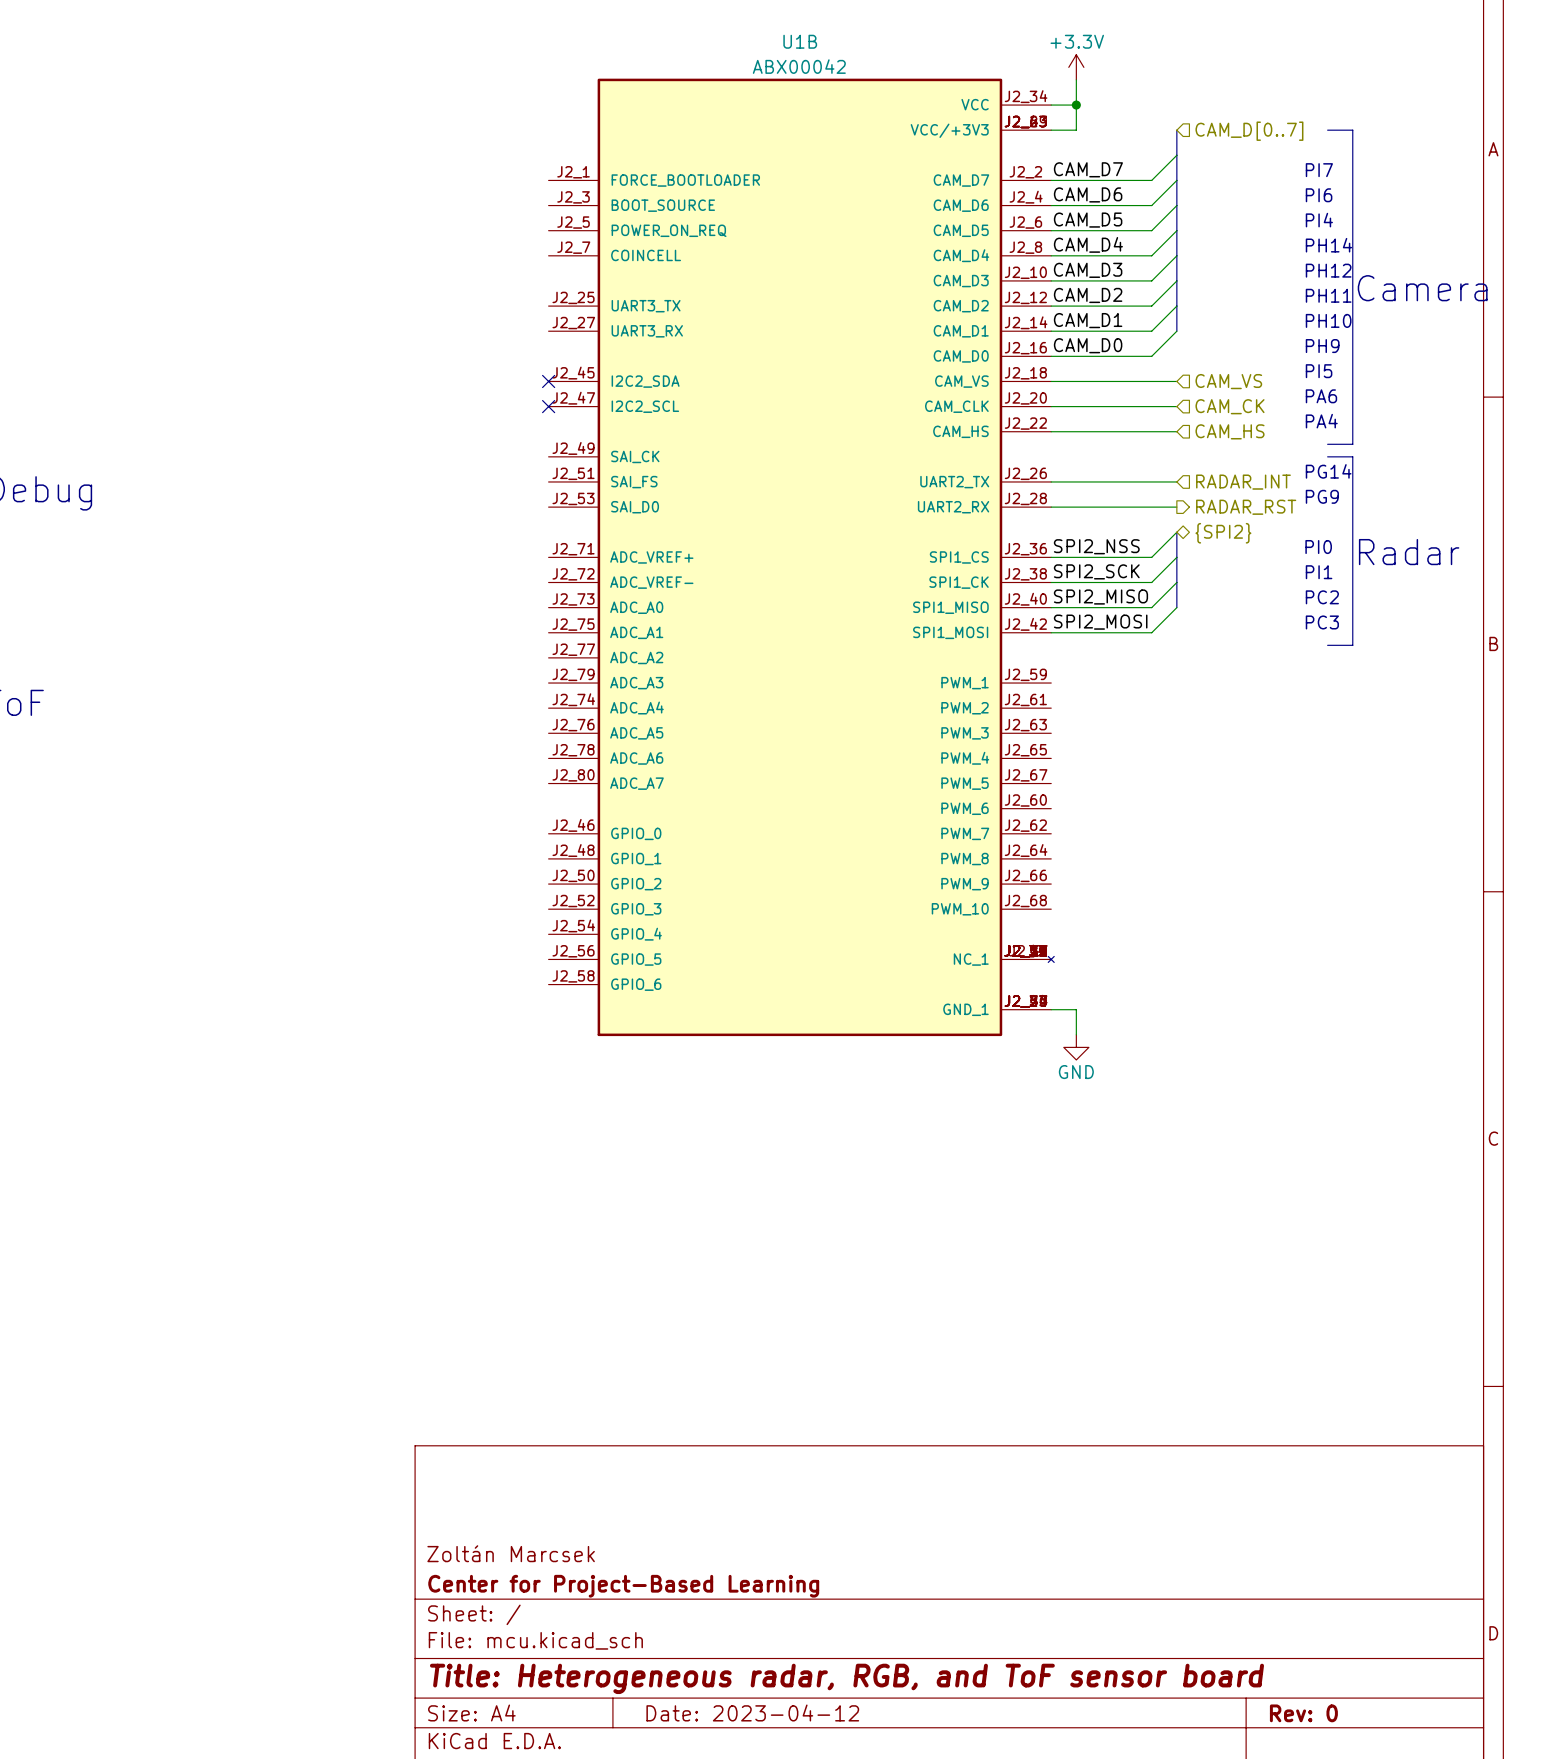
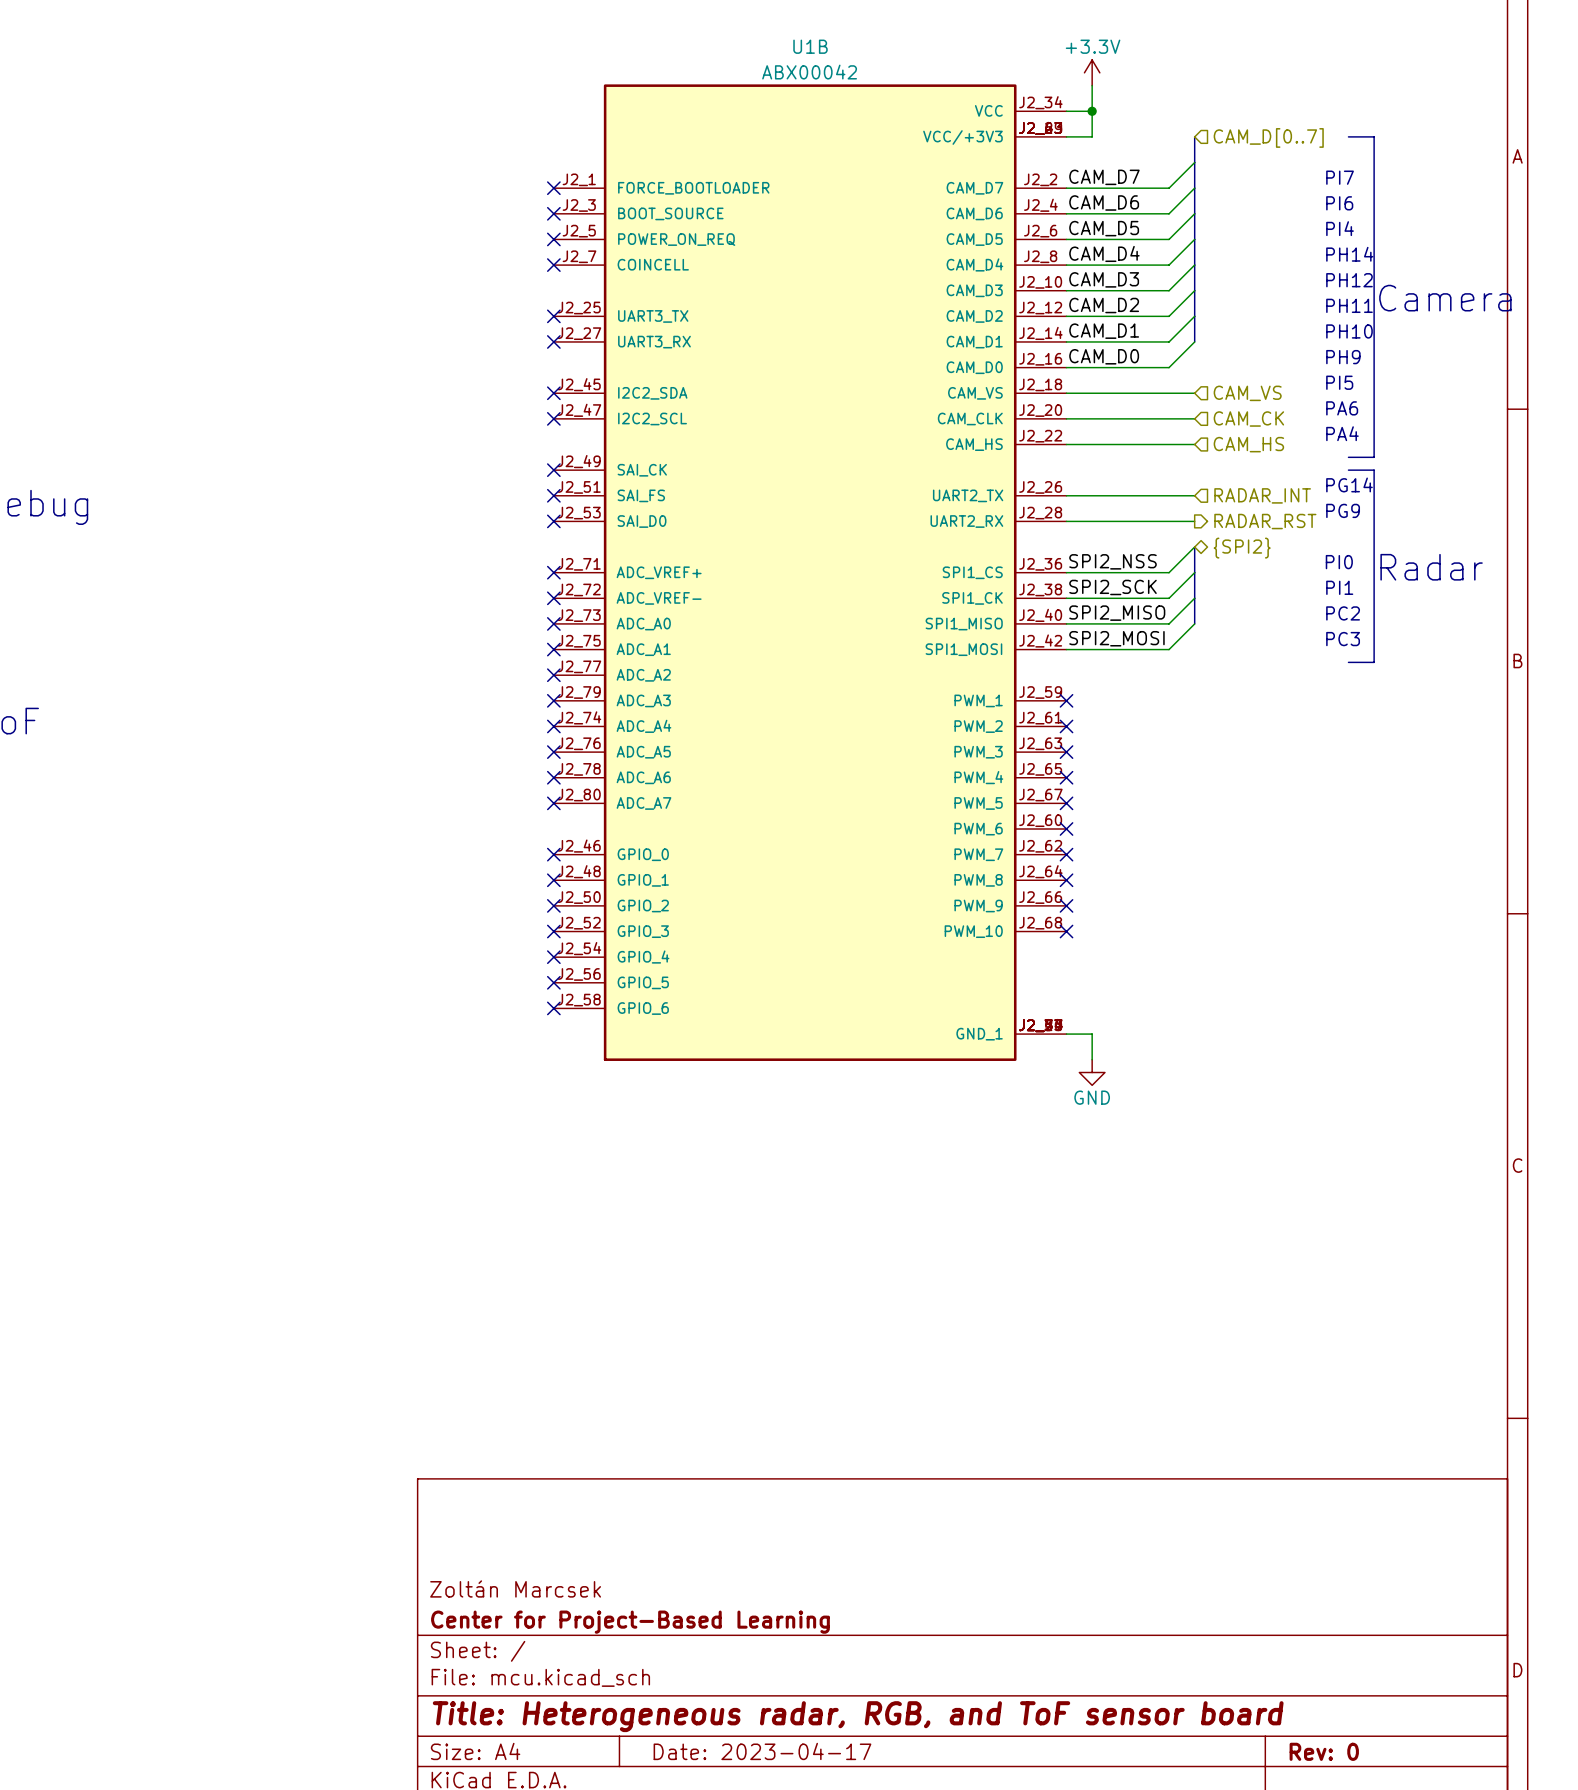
U1B symbol: [548, 78, 1055, 1037] -> [553, 84, 1067, 1061]
no-connect mark: none -> (553, 188)
no-connect mark: none -> (553, 213)
no-connect mark: none -> (553, 239)
no-connect mark: none -> (553, 265)
no-connect mark: none -> (553, 316)
no-connect mark: none -> (553, 341)
no-connect mark: none -> (553, 470)
no-connect mark: none -> (553, 495)
no-connect mark: none -> (553, 521)
no-connect mark: none -> (553, 572)
no-connect mark: none -> (553, 598)
no-connect mark: none -> (553, 623)
no-connect mark: none -> (553, 649)
no-connect mark: none -> (553, 675)
no-connect mark: none -> (553, 700)
no-connect mark: none -> (1066, 700)
no-connect mark: none -> (553, 726)
no-connect mark: none -> (1066, 726)
no-connect mark: none -> (553, 752)
no-connect mark: none -> (1066, 752)
no-connect mark: none -> (553, 777)
no-connect mark: none -> (1066, 777)
no-connect mark: none -> (553, 803)
no-connect mark: none -> (1066, 803)
no-connect mark: none -> (1066, 829)
no-connect mark: none -> (553, 854)
no-connect mark: none -> (1066, 854)
no-connect mark: none -> (553, 880)
no-connect mark: none -> (1066, 880)
no-connect mark: none -> (553, 905)
no-connect mark: none -> (1066, 905)
no-connect mark: none -> (553, 931)
no-connect mark: none -> (1066, 931)
no-connect mark: none -> (553, 957)
no-connect mark: none -> (553, 982)
no-connect mark: none -> (553, 1008)
title block: Date: 2023-04-12 (752, 1713) -> Date: 2023-04-17 (762, 1751)

